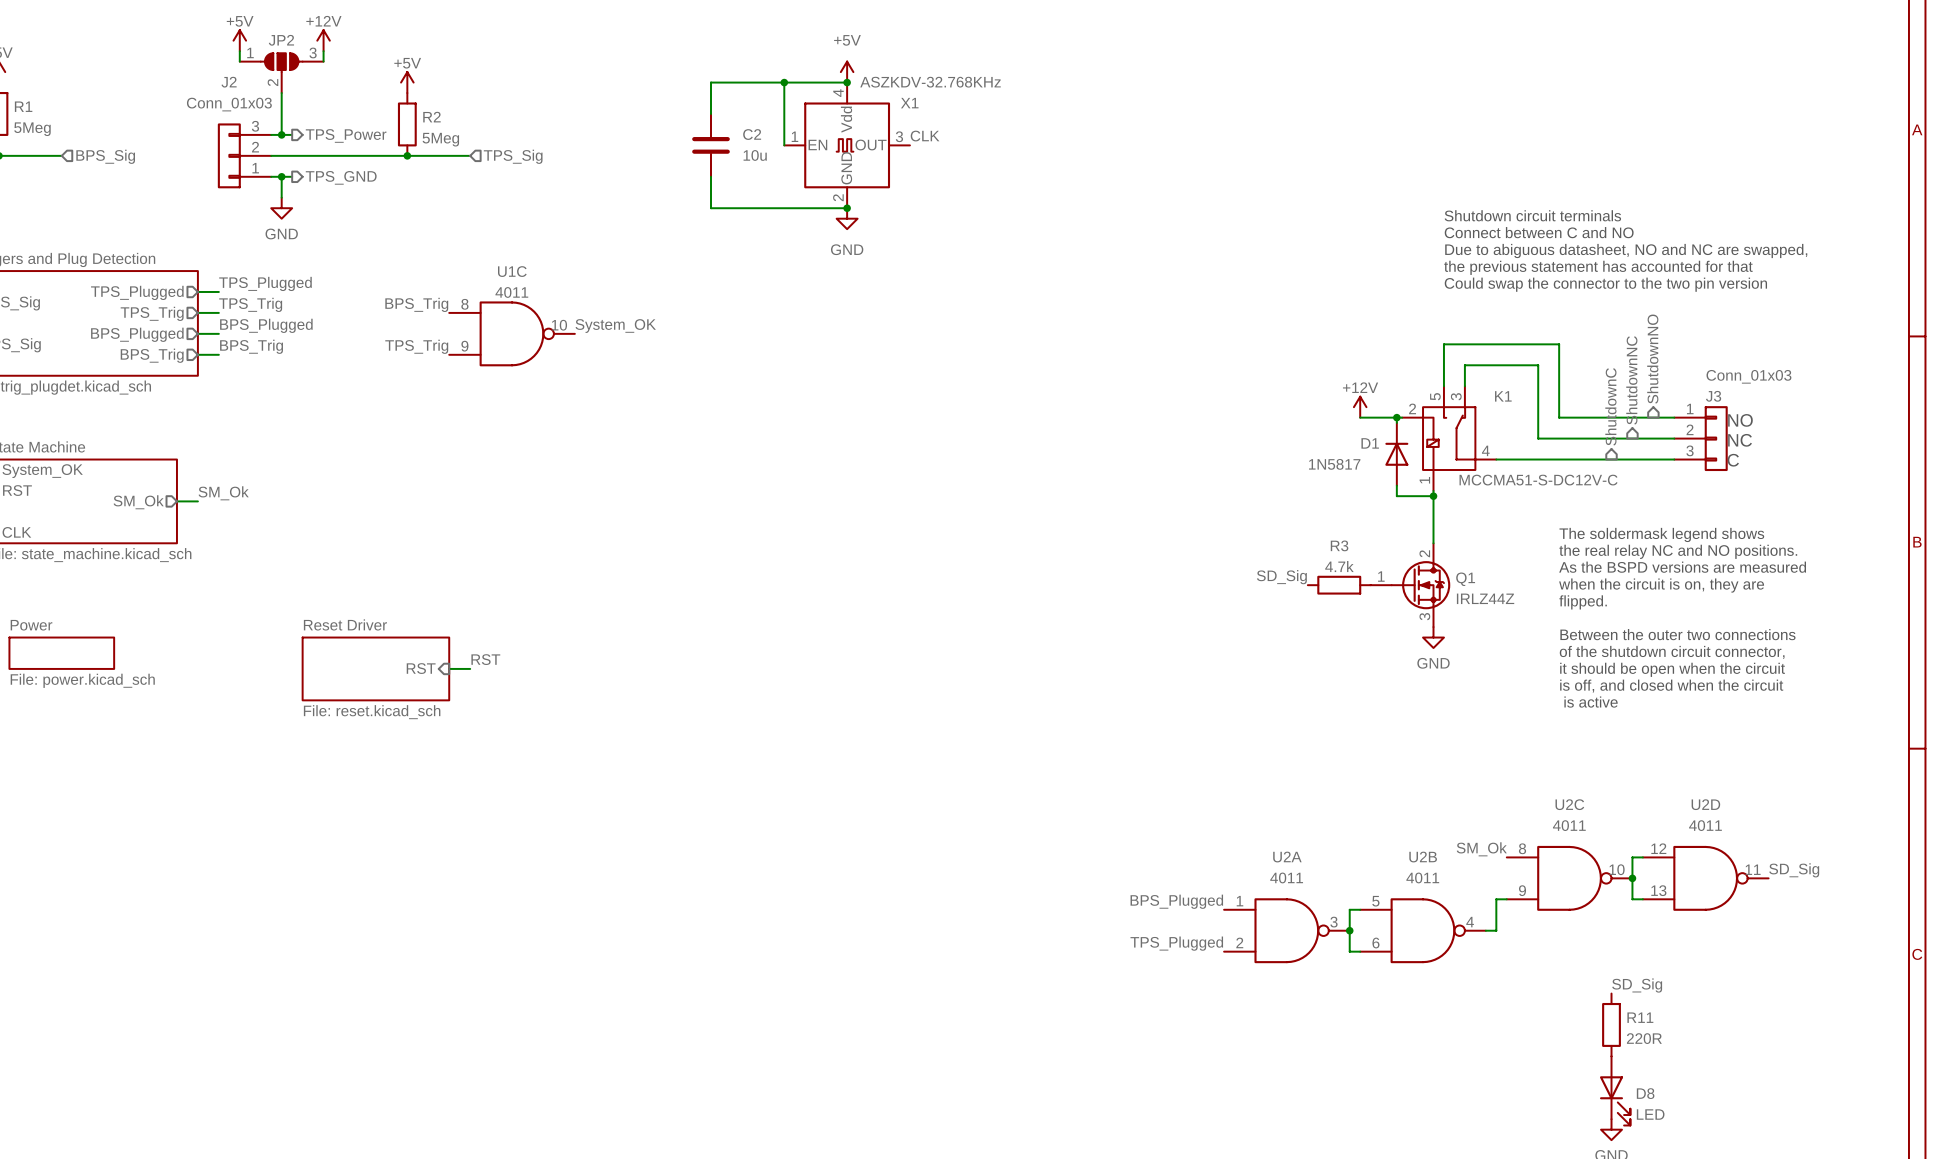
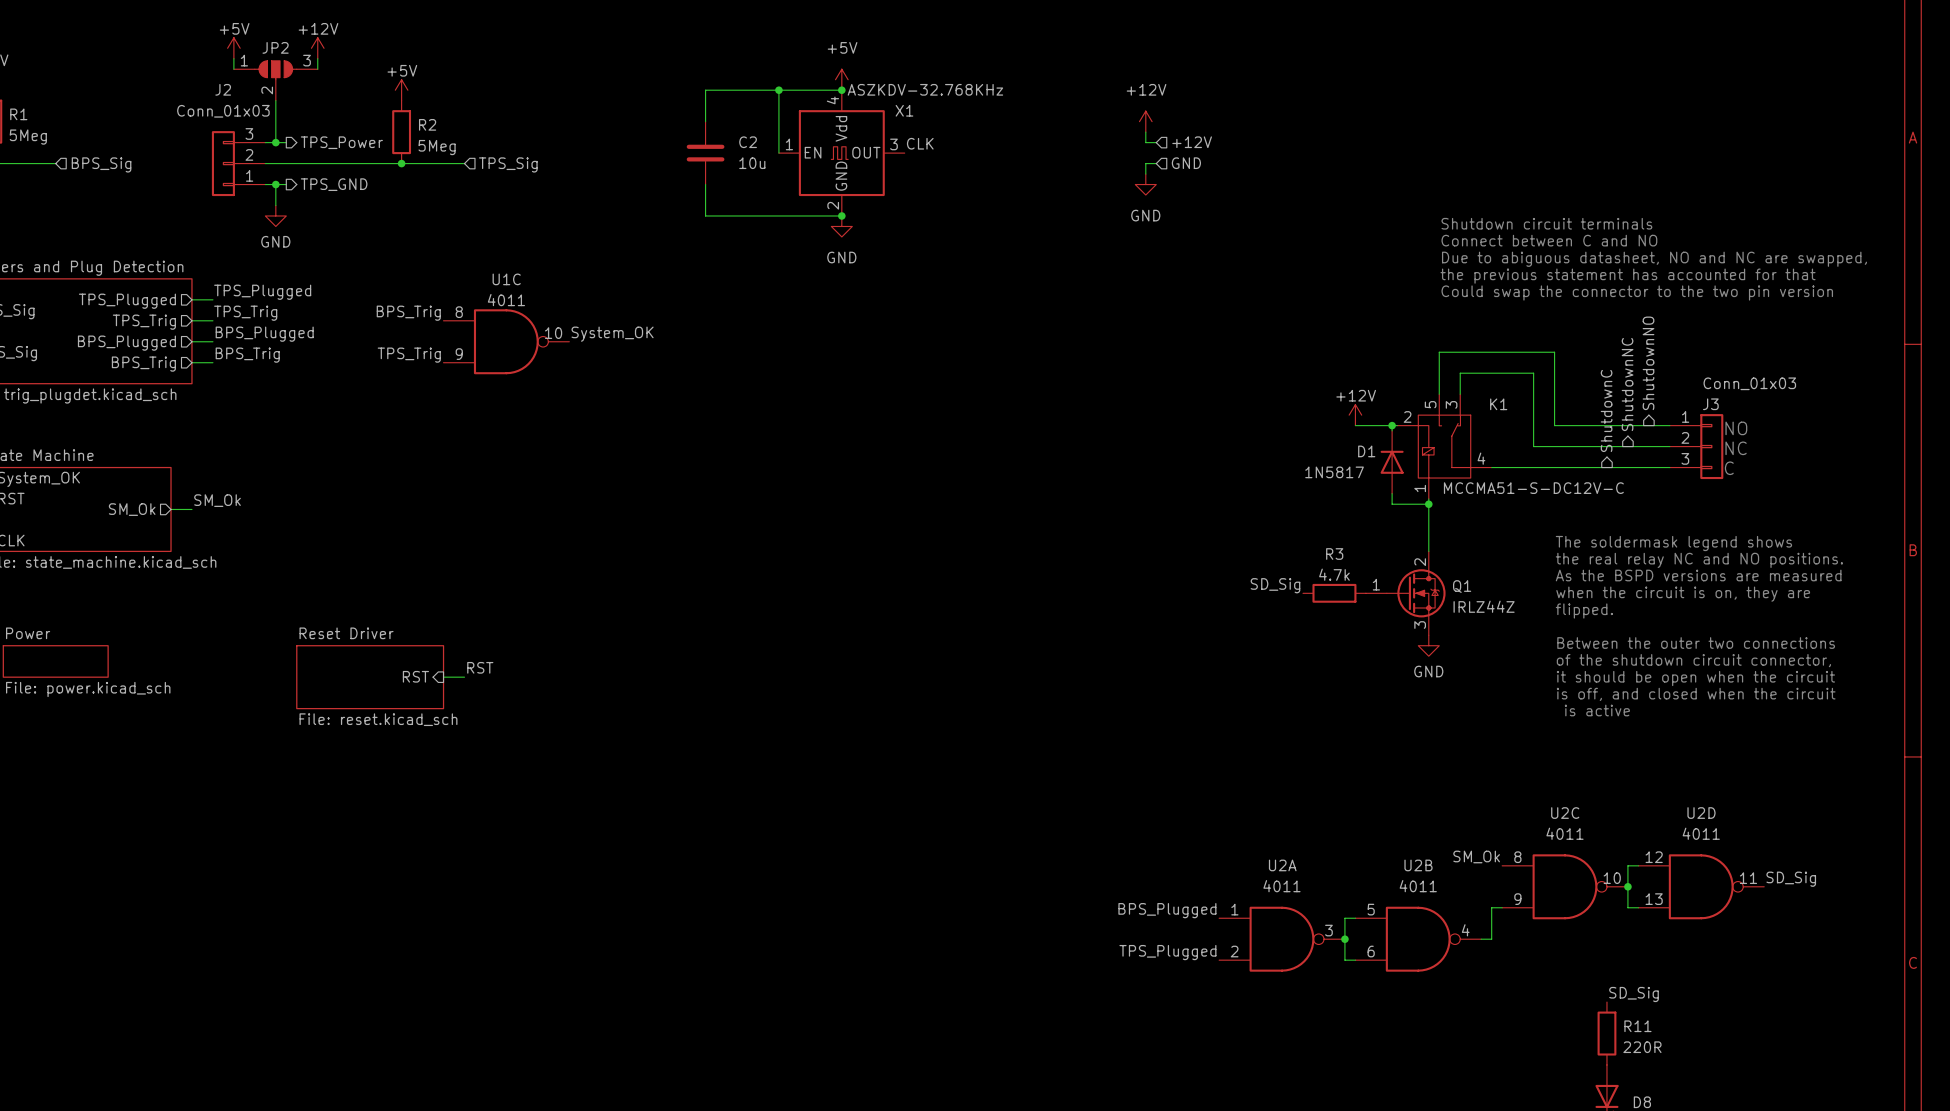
power symbol: none -> +12V (1145, 121)
wire: none -> (1145, 132) (1145, 142) (1156, 142)
hierarchical label: none -> +12V (1192, 142)
wire: none -> (1156, 163) (1145, 163) (1145, 174)
hierarchical label: none -> GND (1186, 163)
power symbol: none -> GND (1145, 184)

